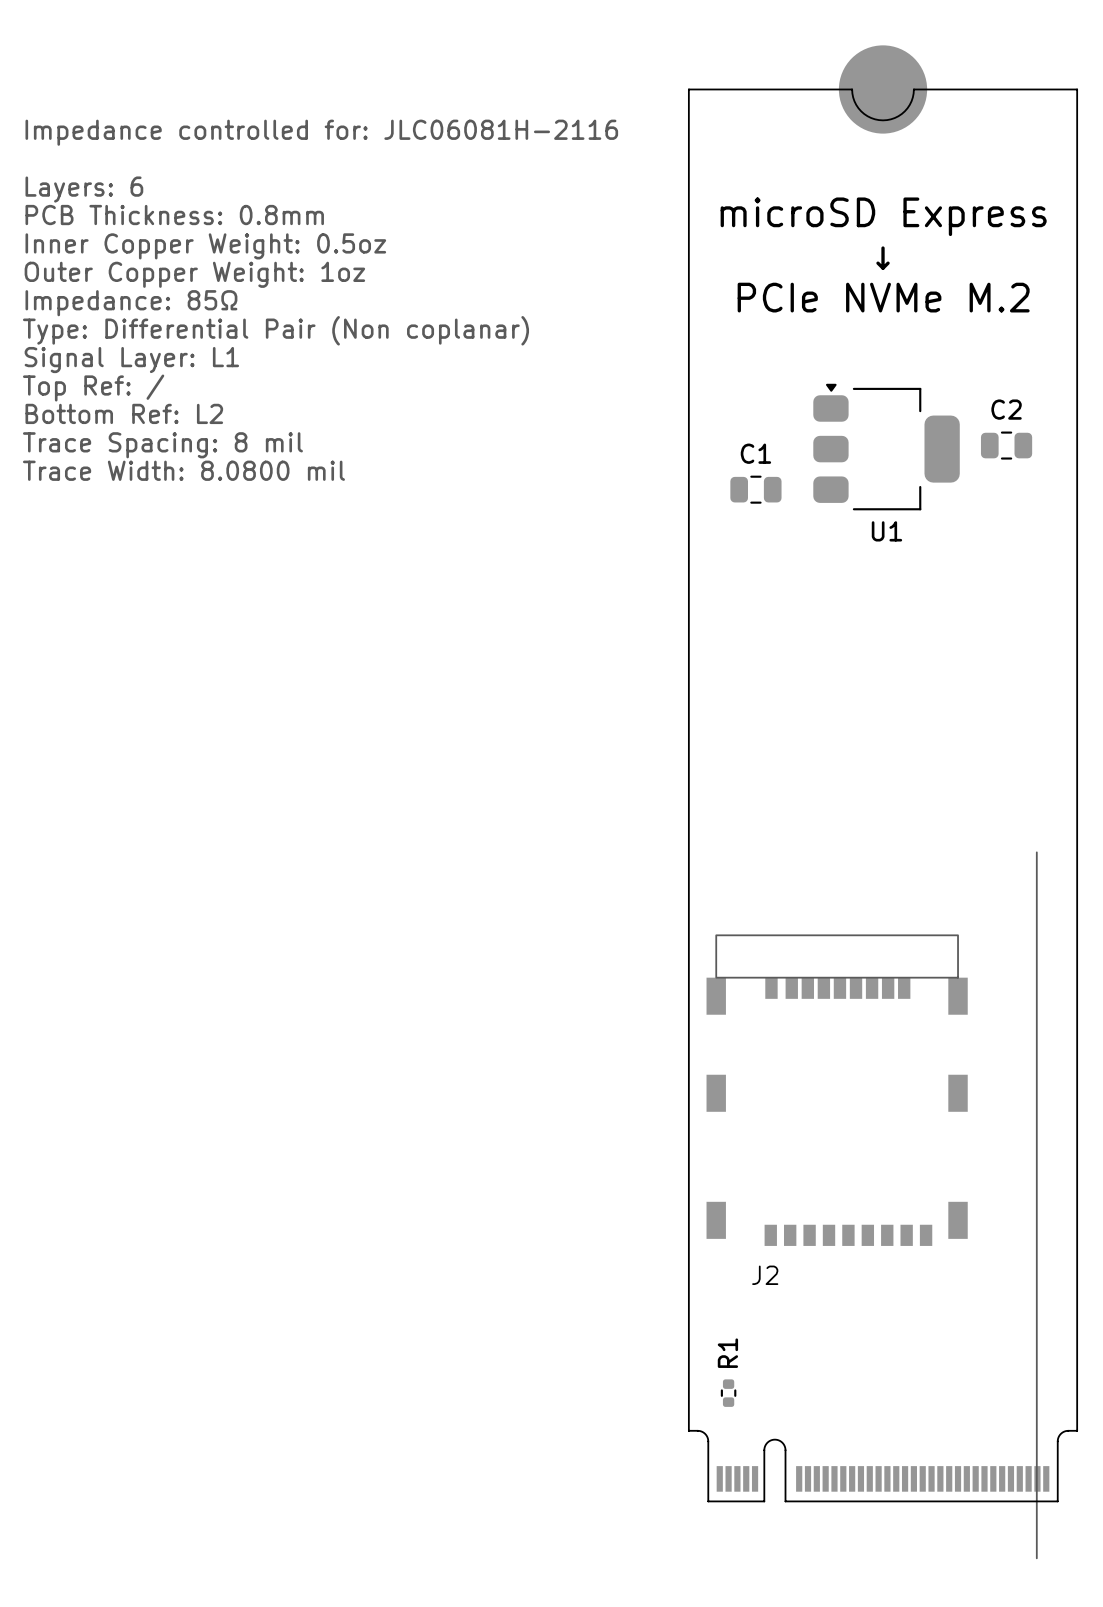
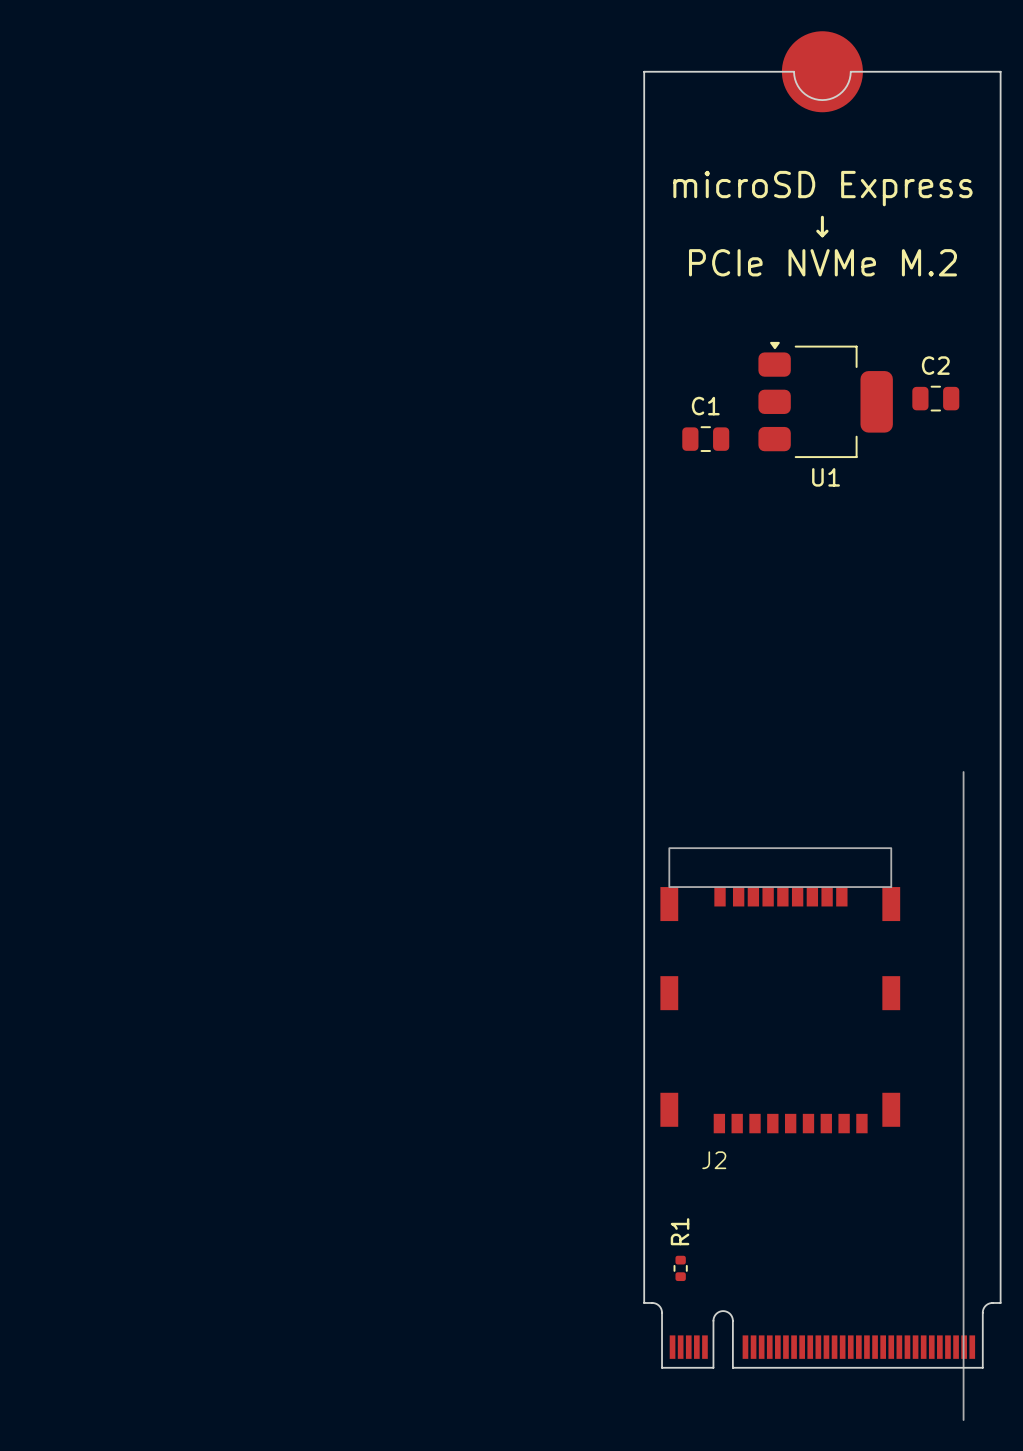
text: Impedance controlled for: JLC06081H-2116 (321, 132) -> none
text: Layers: 6 (84, 189) -> none
text: PCB Thickness: 0.8mm (174, 215) -> none
text: Inner Copper Weight: 0.5oz (205, 246) -> none
text: Outer Copper Weight: 1oz (194, 274) -> none
text: Impedance: 85Ω (131, 303) -> none
text: Type: Differential Pair (Non coplanar) (275, 330) -> none
text: Signal Layer: L1 (131, 360) -> none
text: Top Ref: / (93, 388) -> none
text: Bottom Ref: L2 (124, 413) -> none
text: Trace Spacing: 8 mil (162, 445) -> none
text: Trace Width: 8.0800 mil (183, 470) -> none

